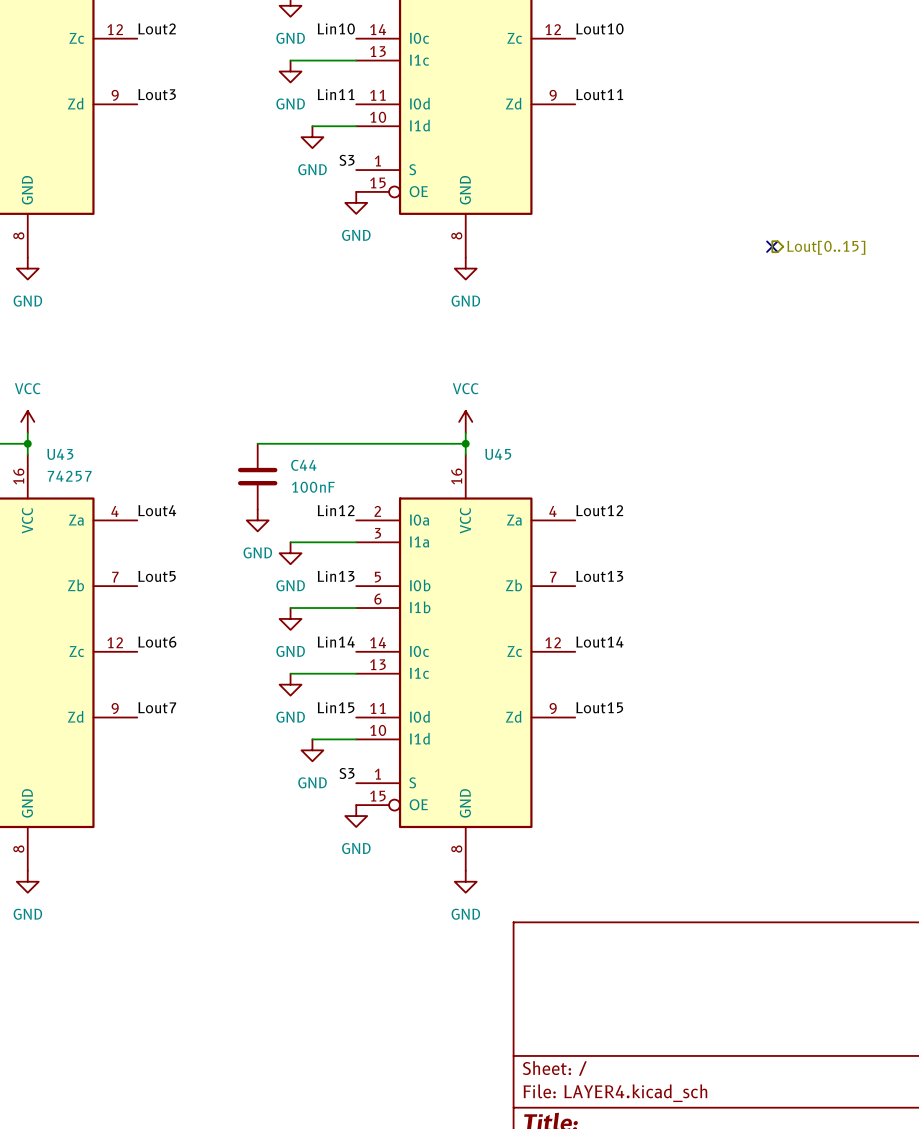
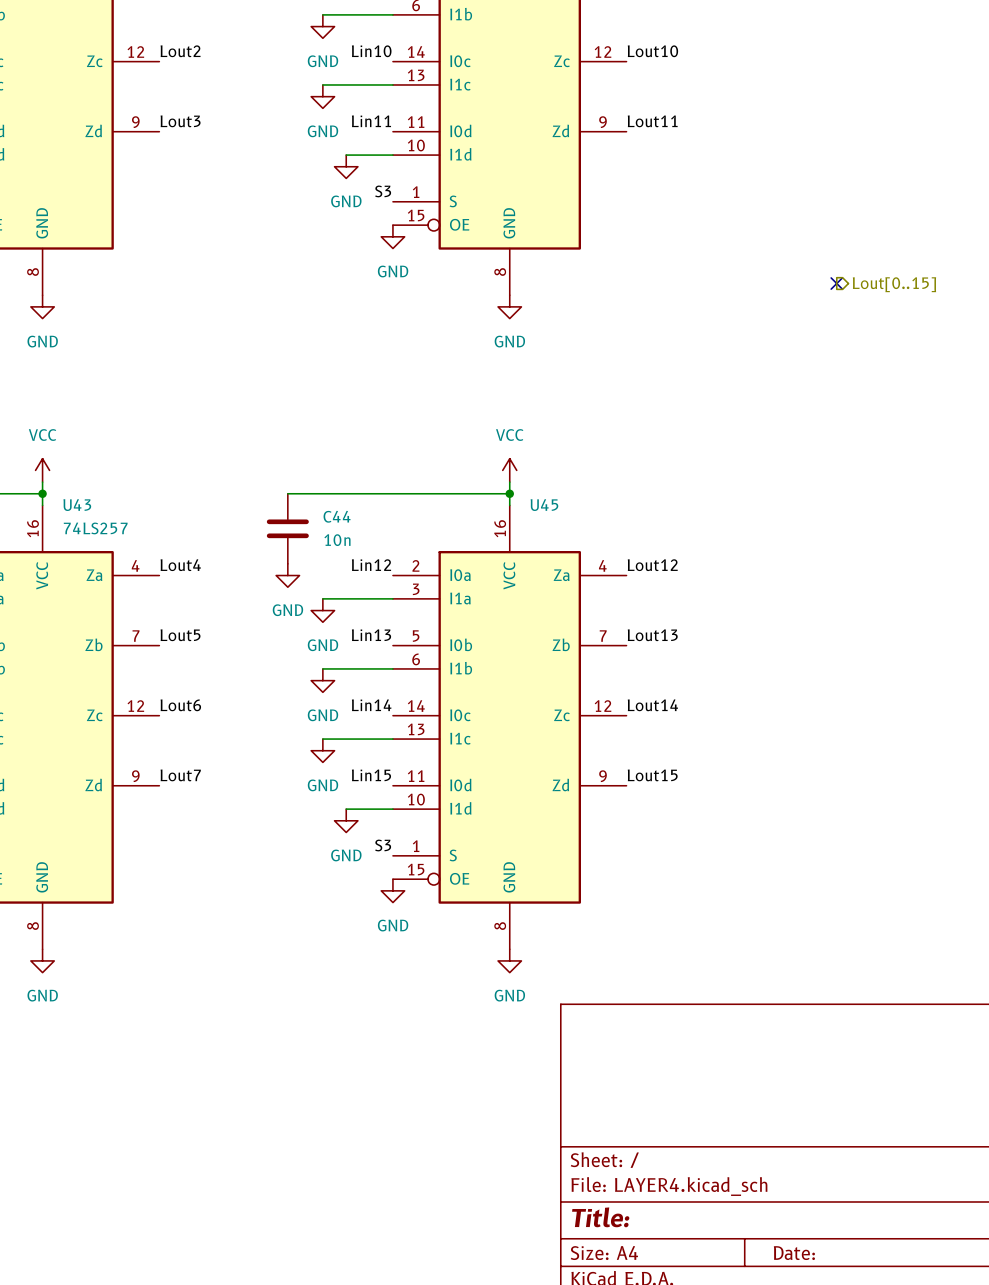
U43 value: 74257 (69, 476) -> 74LS257 (95, 528)
C44 value: 100nF (313, 487) -> 10n (337, 540)

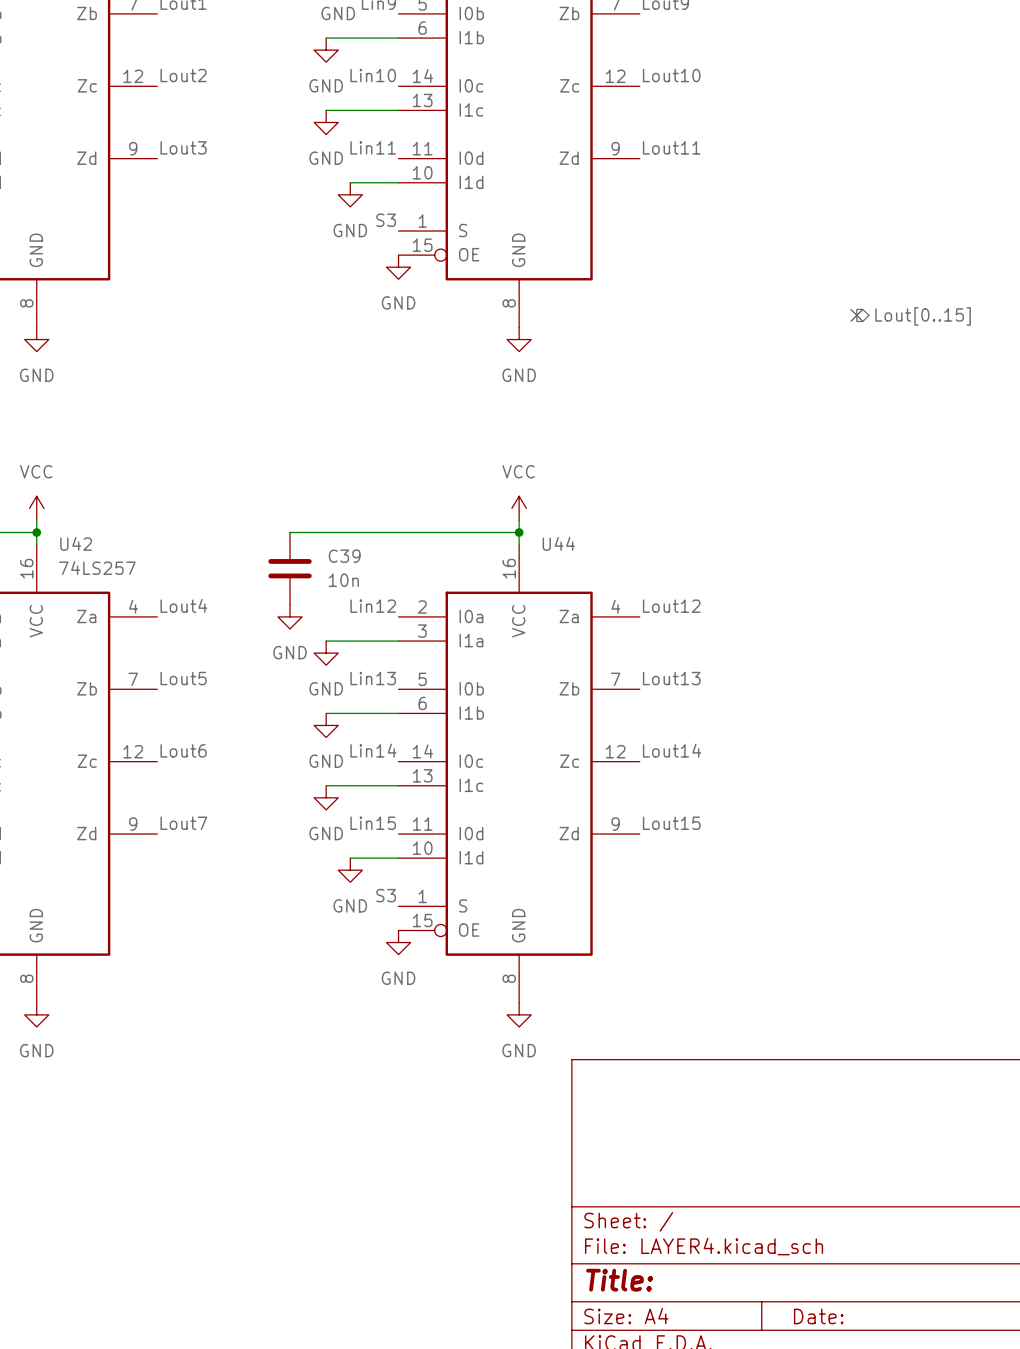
U43 name: U43 (77, 505) -> U42 (76, 543)
U45 name: U45 (544, 505) -> U44 (558, 543)
C44 name: C44 (337, 516) -> C39 (344, 556)

